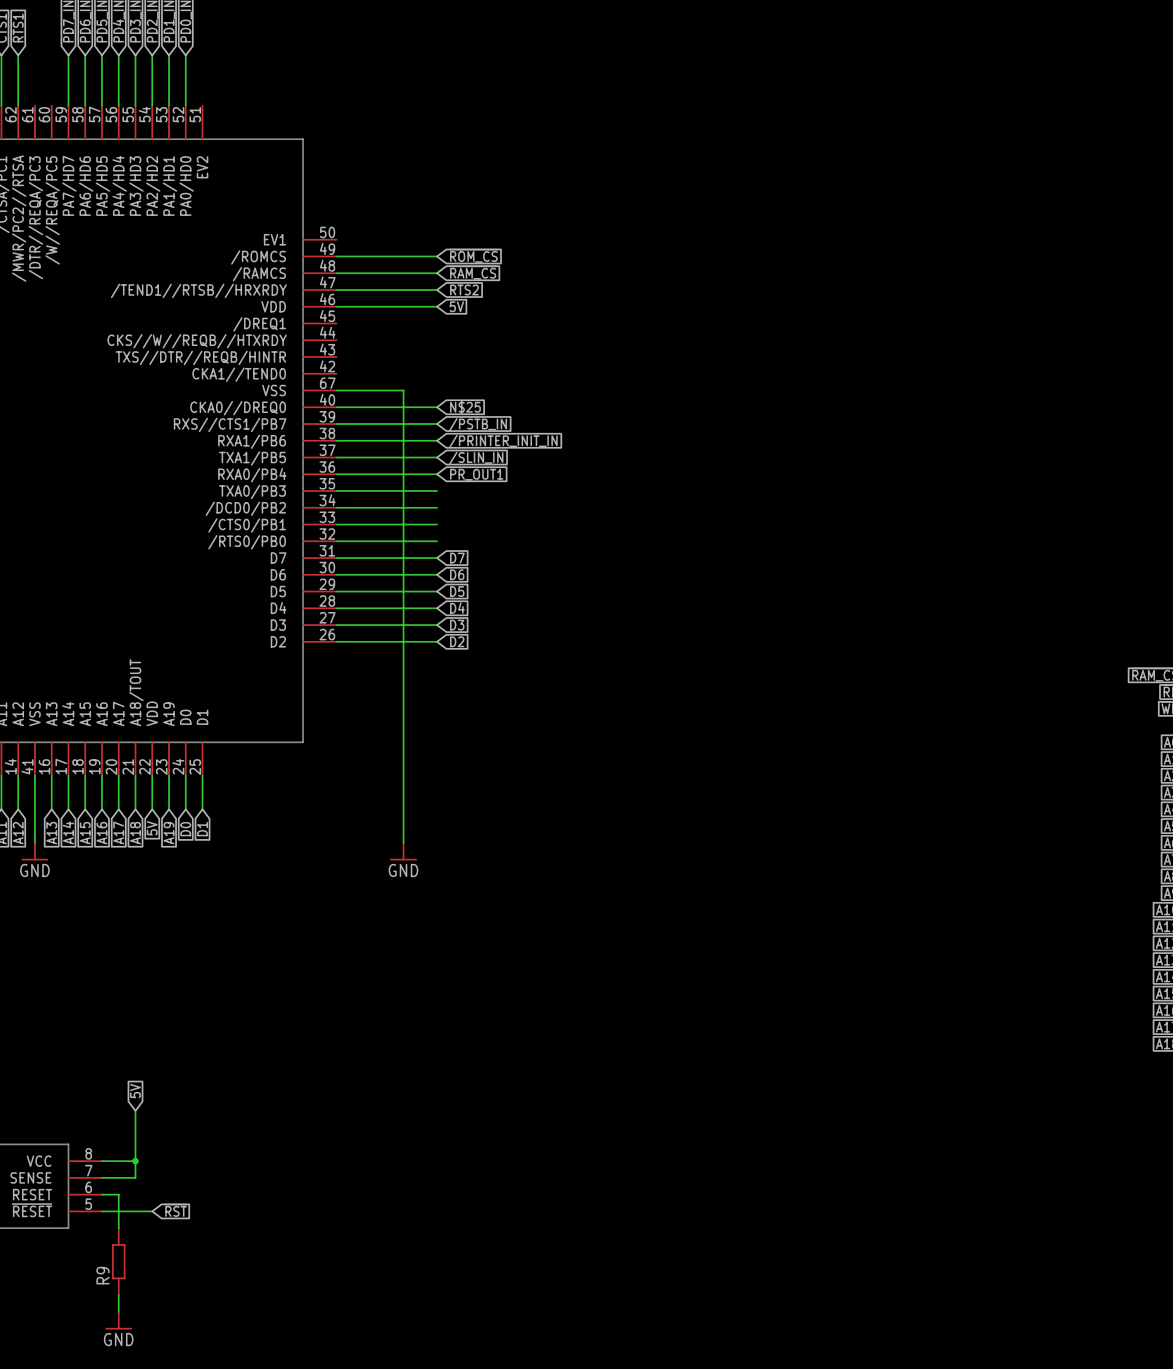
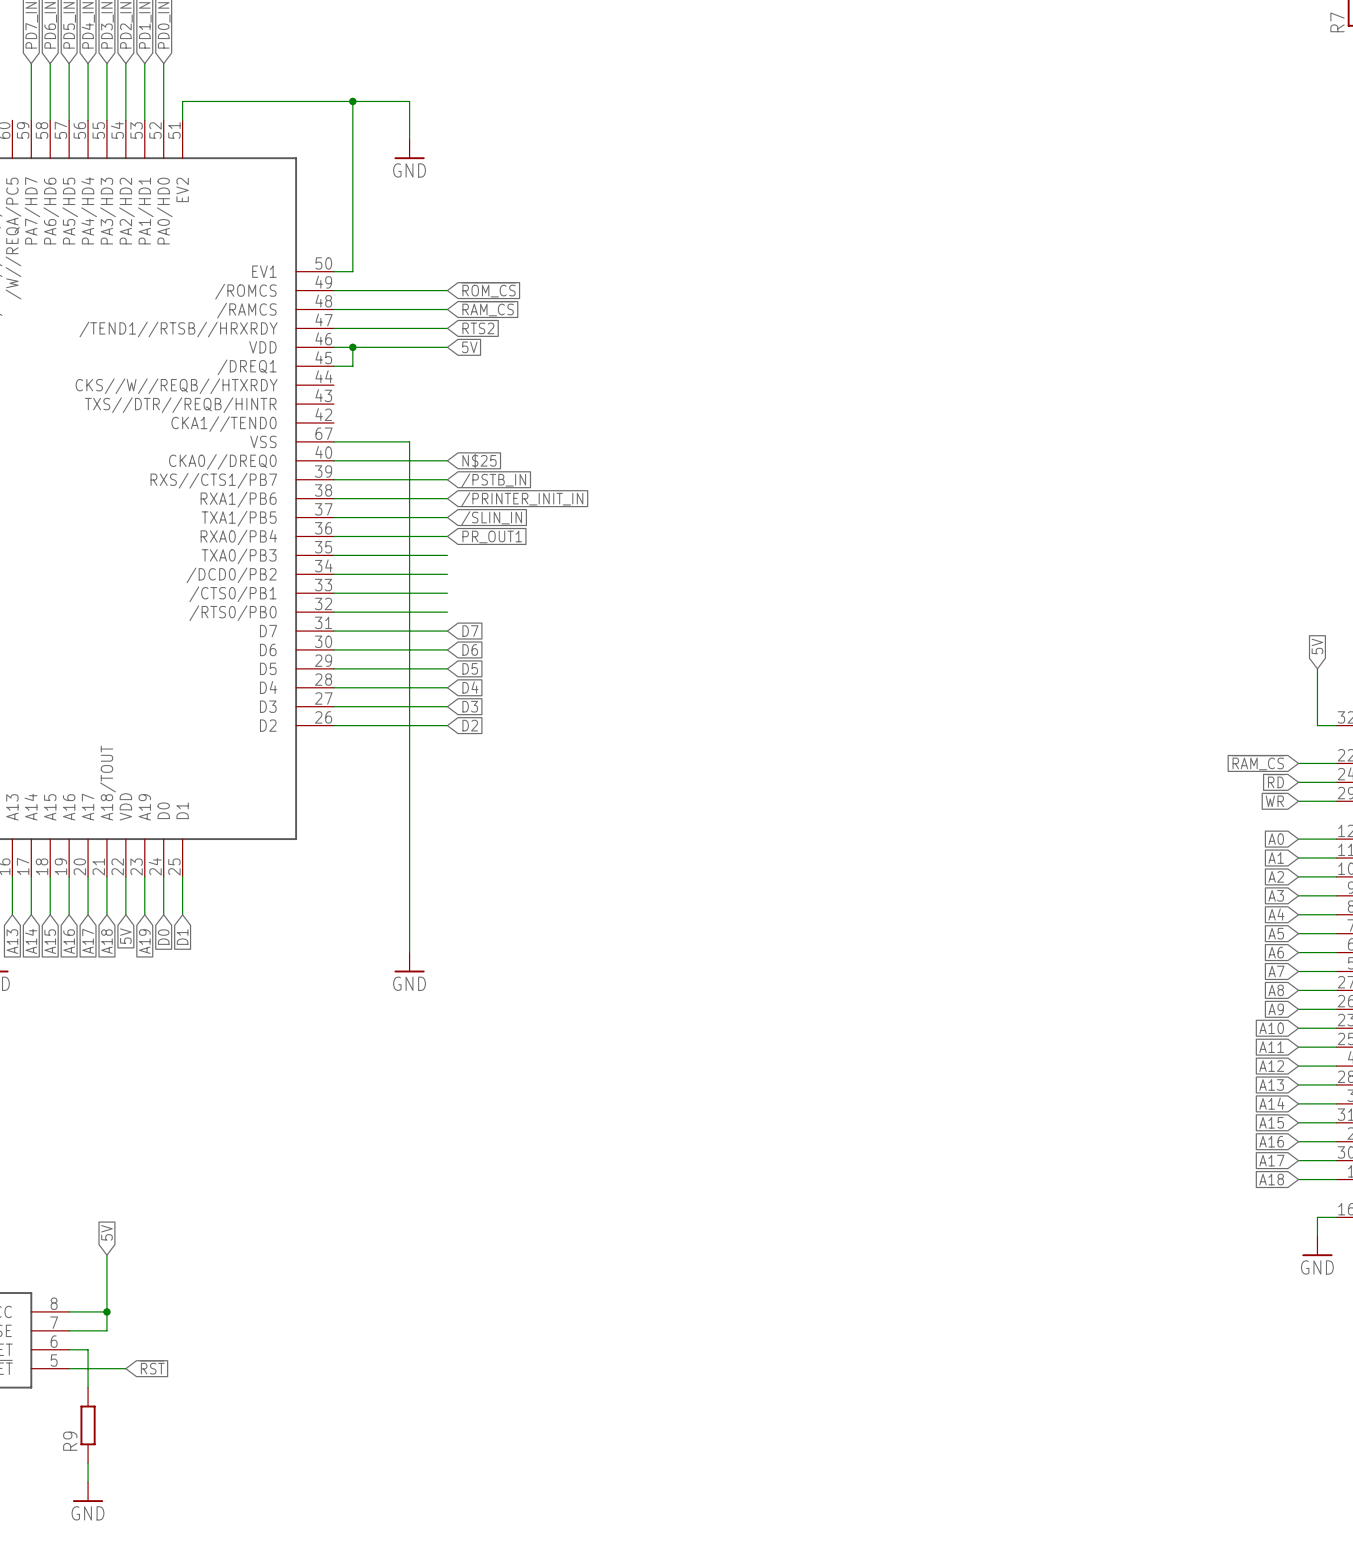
wire: none -> (352, 101) (352, 271) (333, 271)
junction: none -> (352, 101)
wire: none -> (182, 120) (182, 101) (409, 101) (409, 139)
power symbol: none -> GND (409, 149)
wire: none -> (352, 347) (352, 366) (333, 366)
junction: none -> (352, 347)

